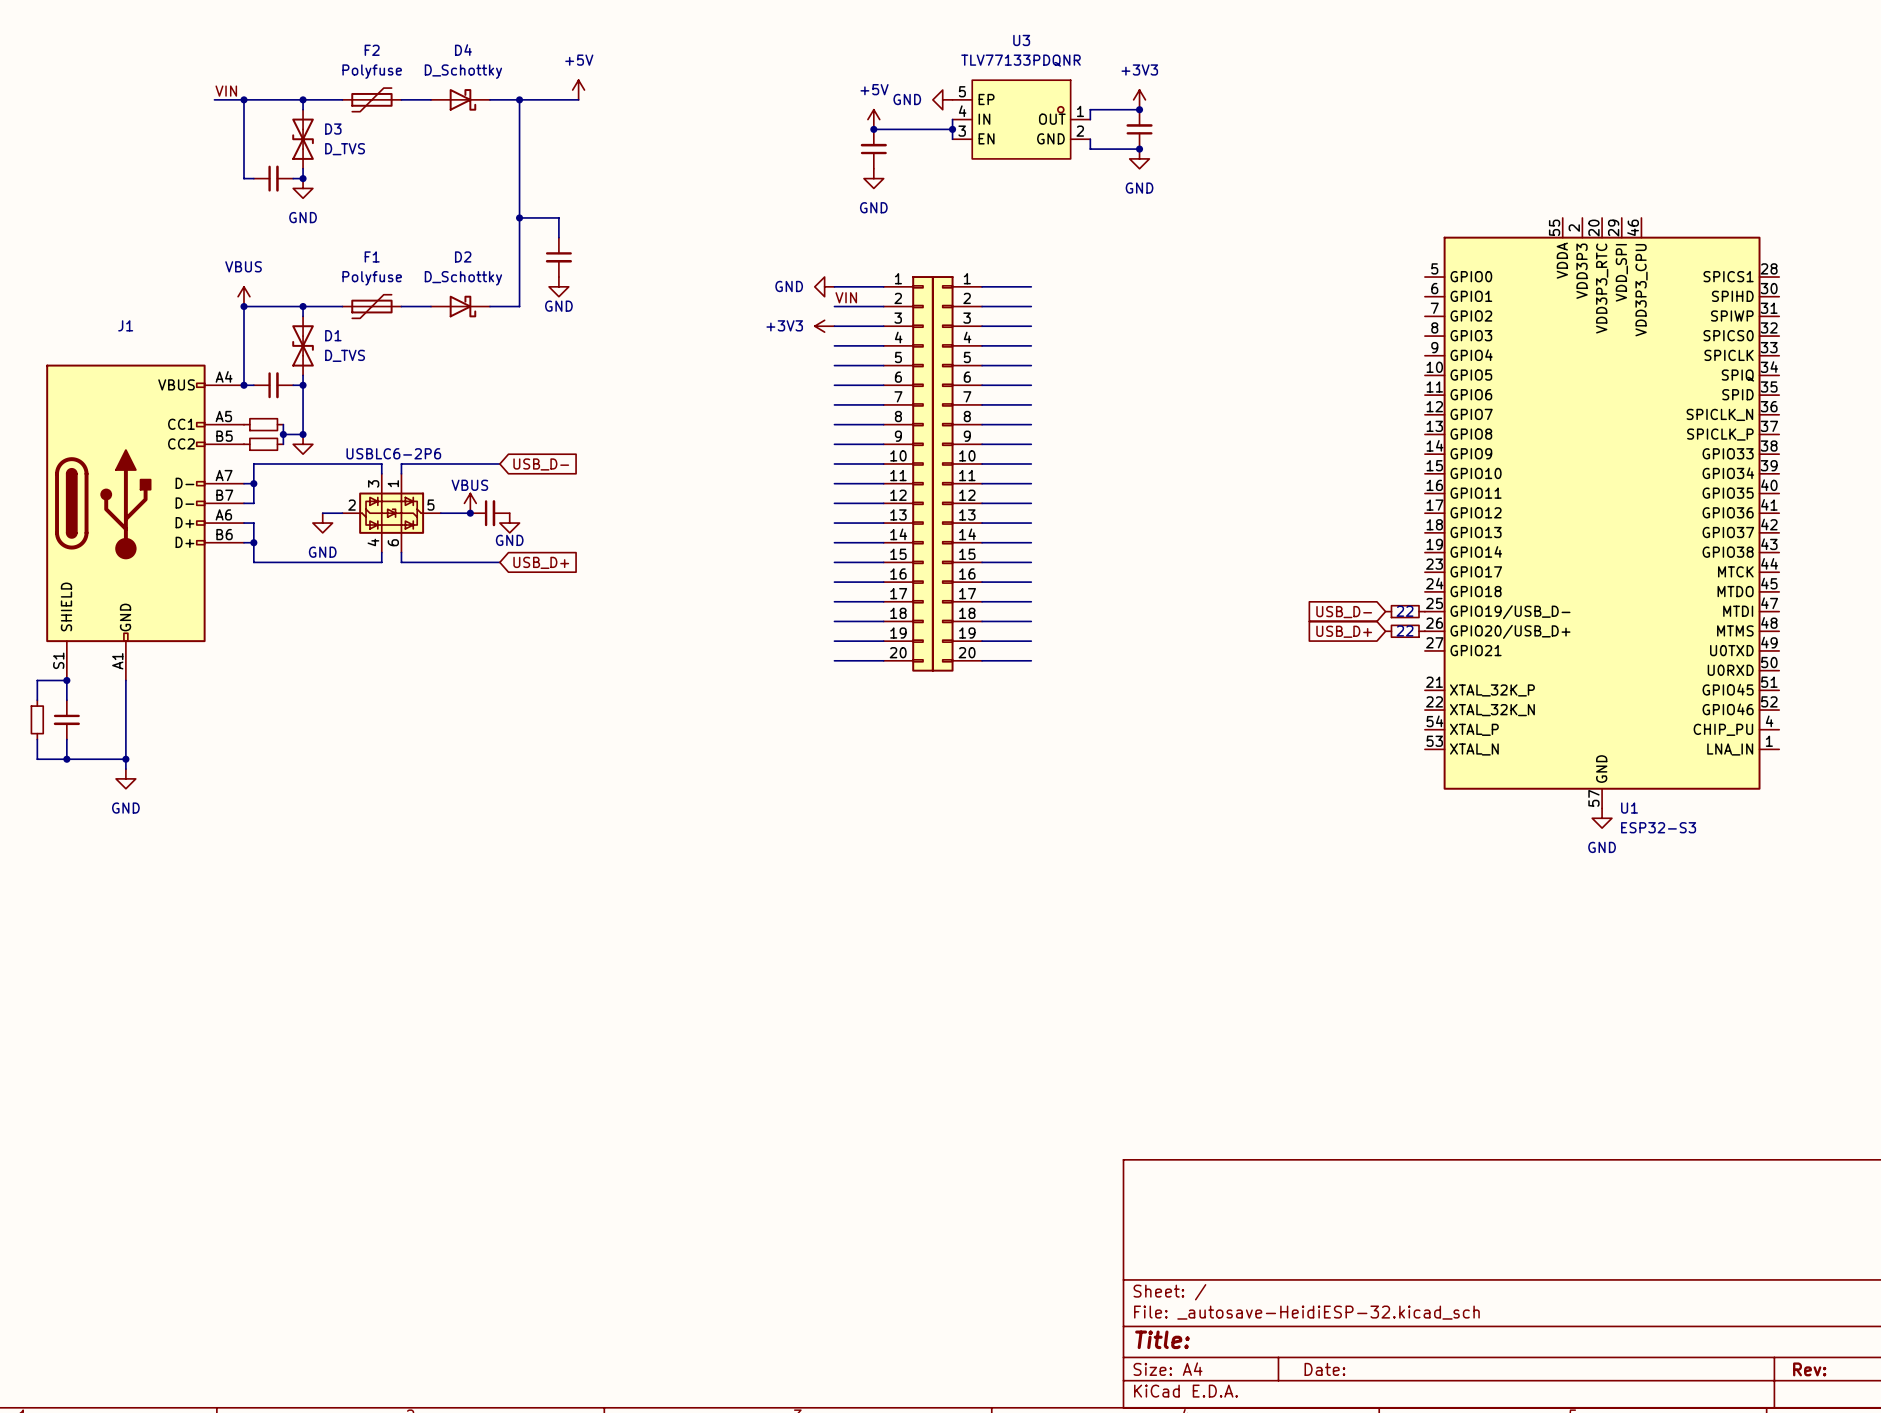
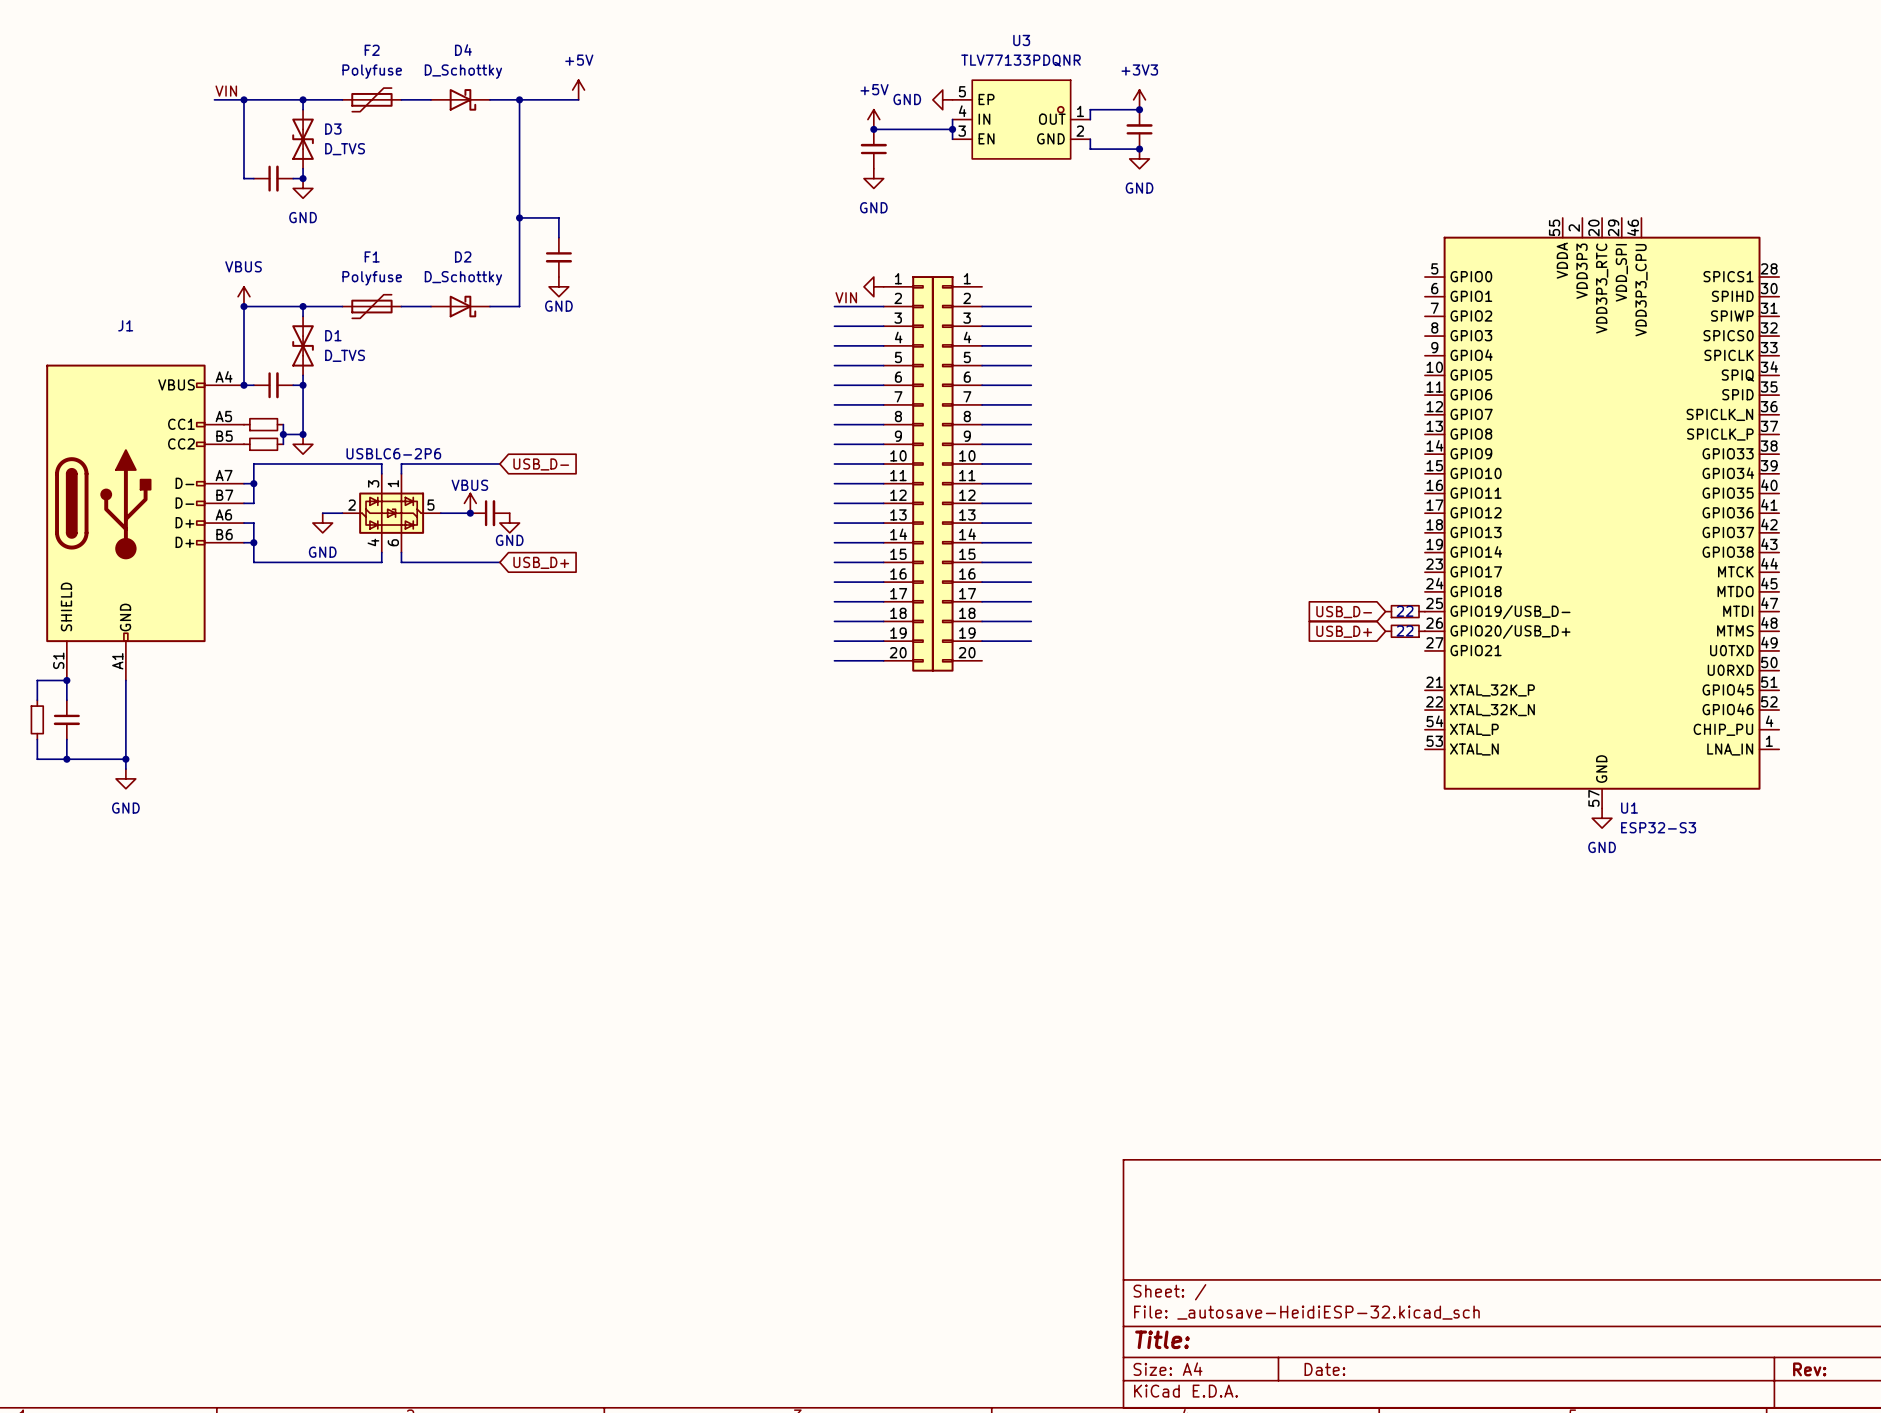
power symbol: GND (824, 286) -> none
wire: (834, 286) (883, 286) -> none
power symbol: none -> (873, 286)
wire: (982, 286) (1031, 286) -> none
power symbol: +3V3 (824, 326) -> none
wire: (982, 660) (1031, 660) -> none

